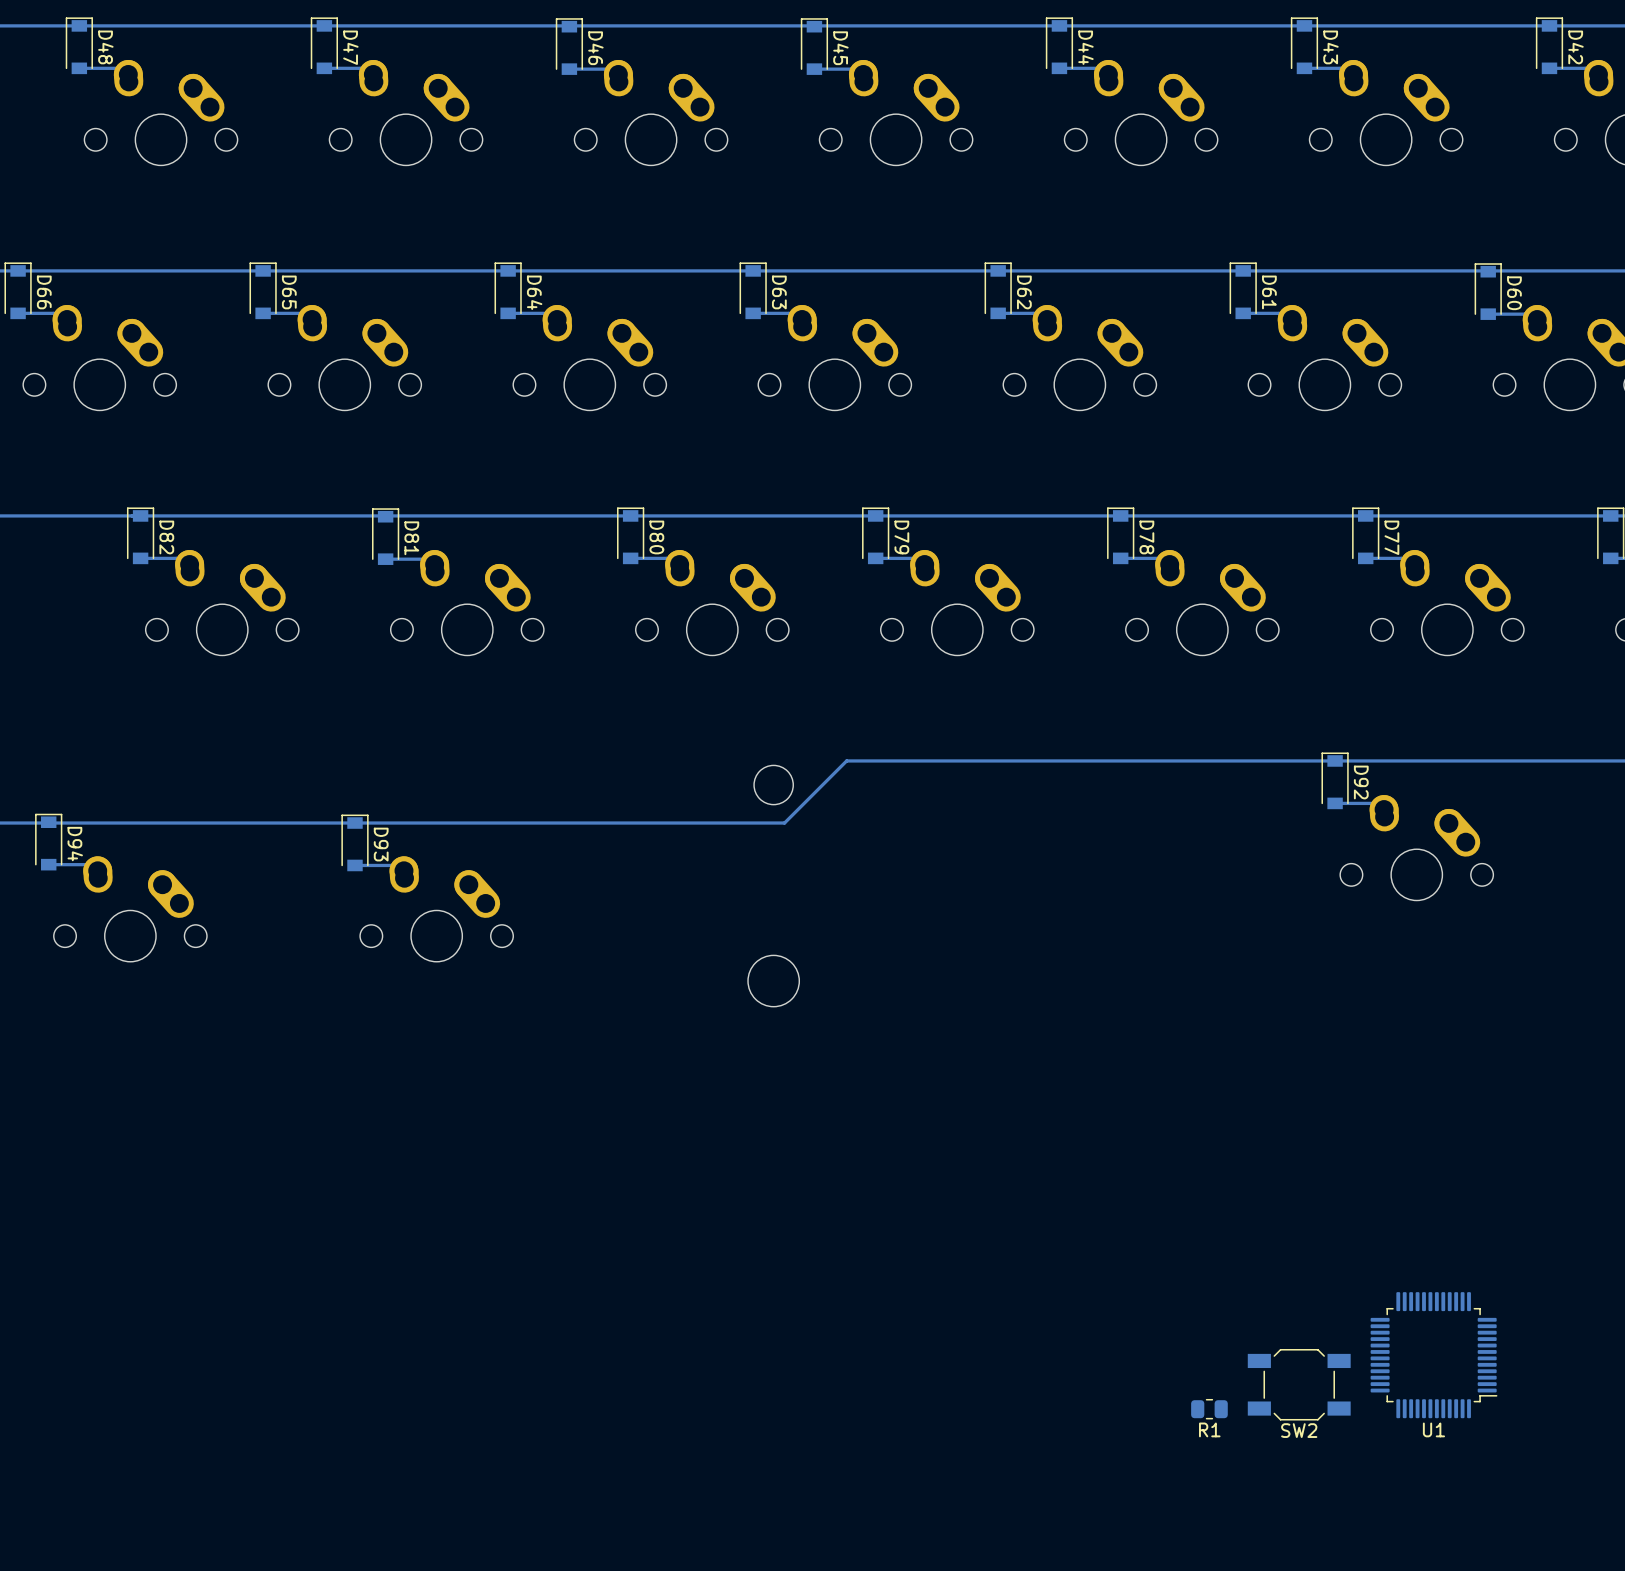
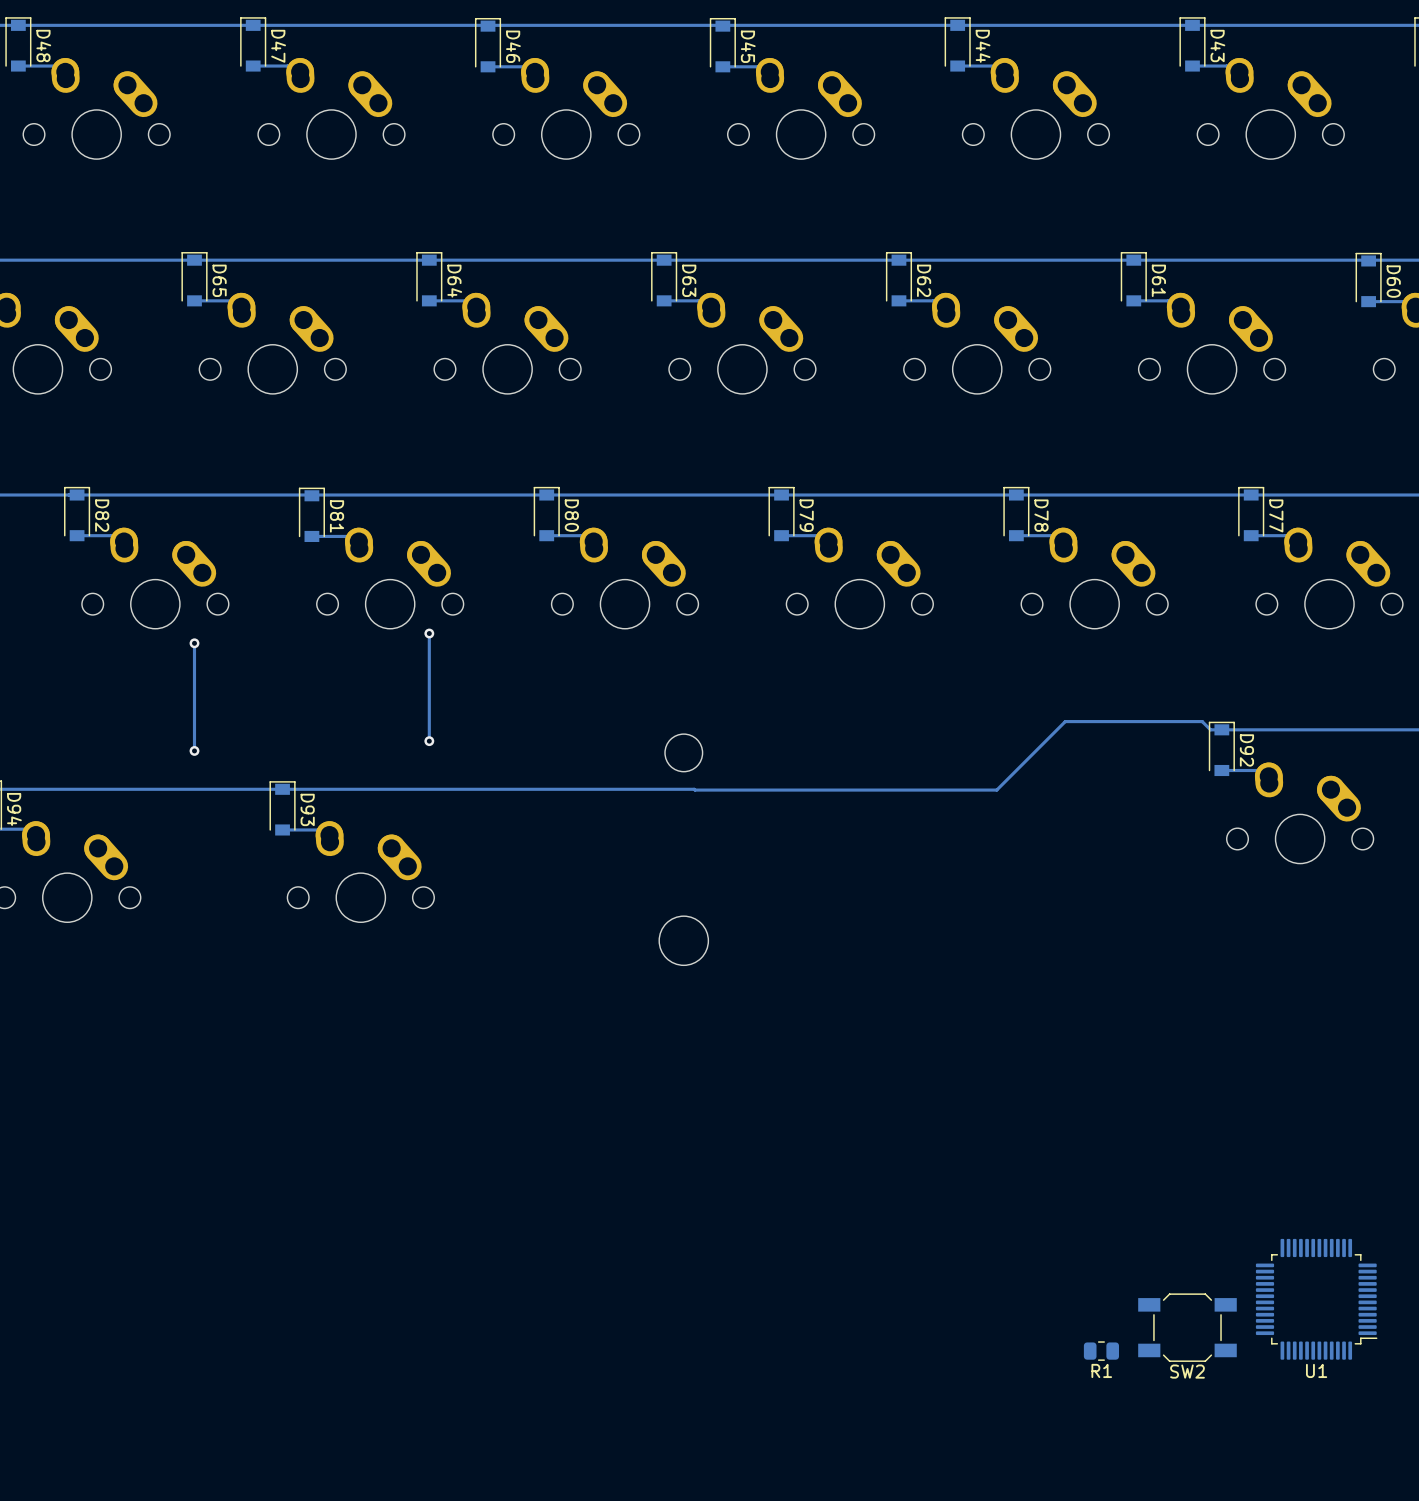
track: none -> (429, 633) (429, 741)
via: none -> (429, 633)
track: none -> (194, 643) (194, 750)
via: none -> (194, 643)
track: (1323, 760) (846, 760) (784, 823) -> (1210, 729) (1202, 721) (1065, 721) (996, 790) (694, 789)
via: none -> (429, 741)
via: none -> (194, 750)

